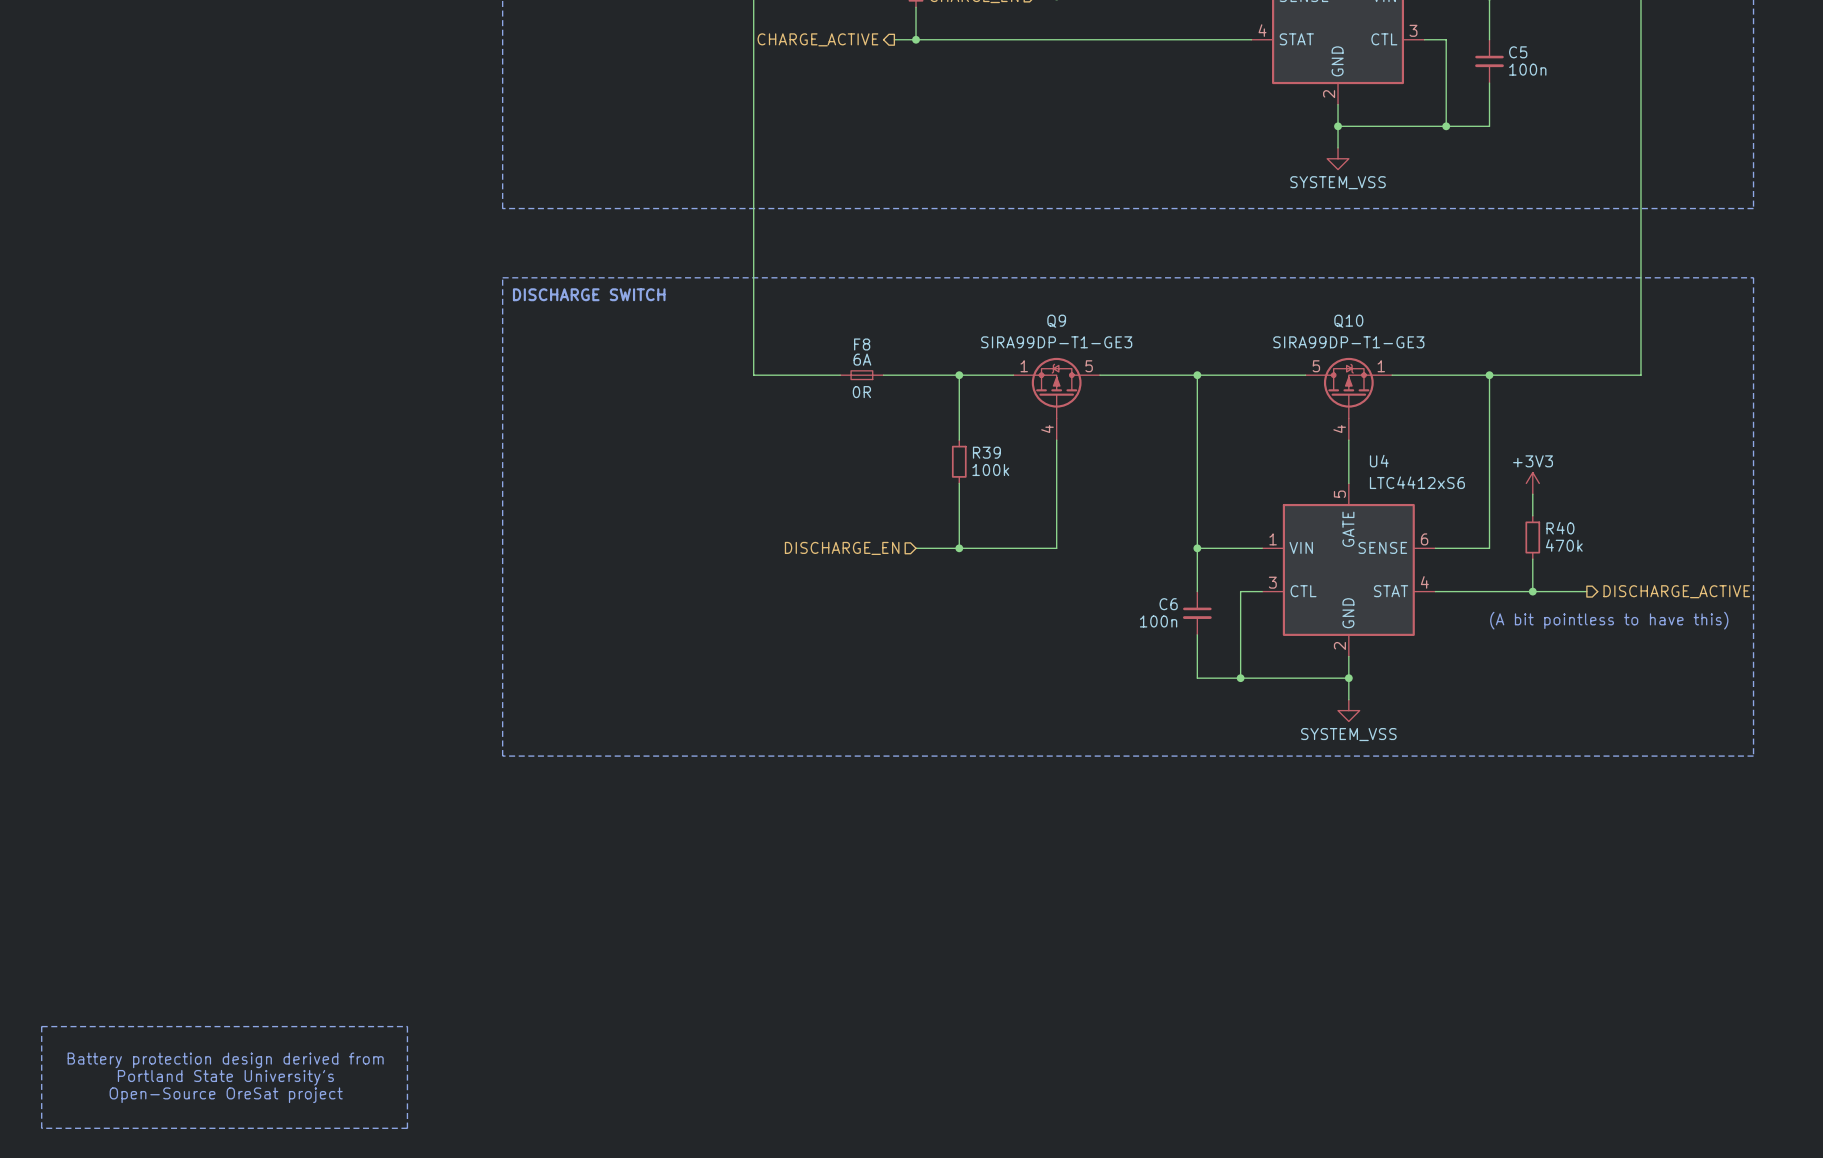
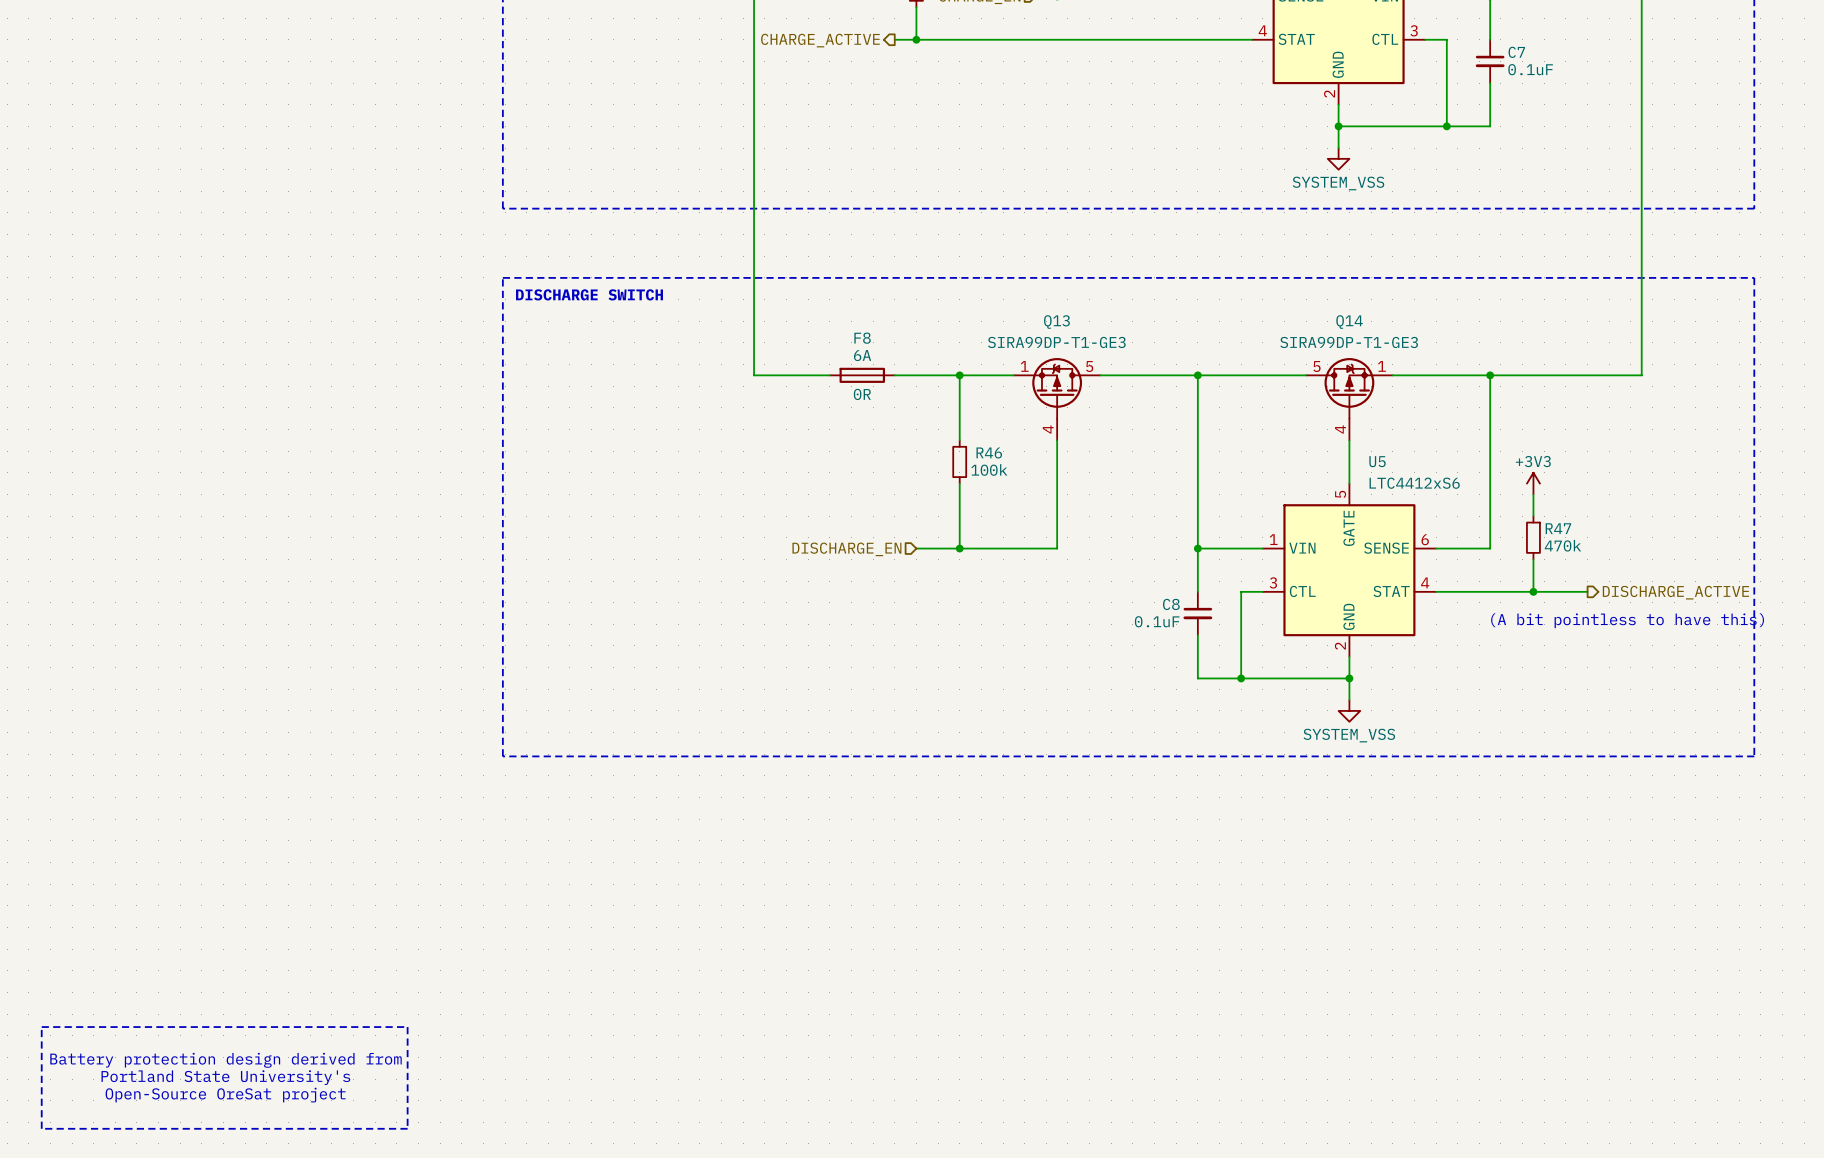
C5 name: C5 (1518, 52) -> C7 (1516, 52)
C5 value: 100n (1527, 69) -> 0.1uF (1530, 69)
Q9 name: Q9 (1056, 321) -> Q13 (1056, 322)
Q10 name: Q10 (1348, 321) -> Q14 (1349, 322)
F8 symbol: [840, 370, 884, 380] -> [829, 367, 895, 383]
R39 name: R39 (986, 452) -> R46 (989, 452)
U4 name: U4 (1379, 461) -> U5 (1377, 461)
R40 name: R40 (1560, 528) -> R47 (1558, 528)
C6 name: C6 (1168, 604) -> C8 (1171, 604)
C6 value: 100n (1158, 621) -> 0.1uF (1157, 621)

